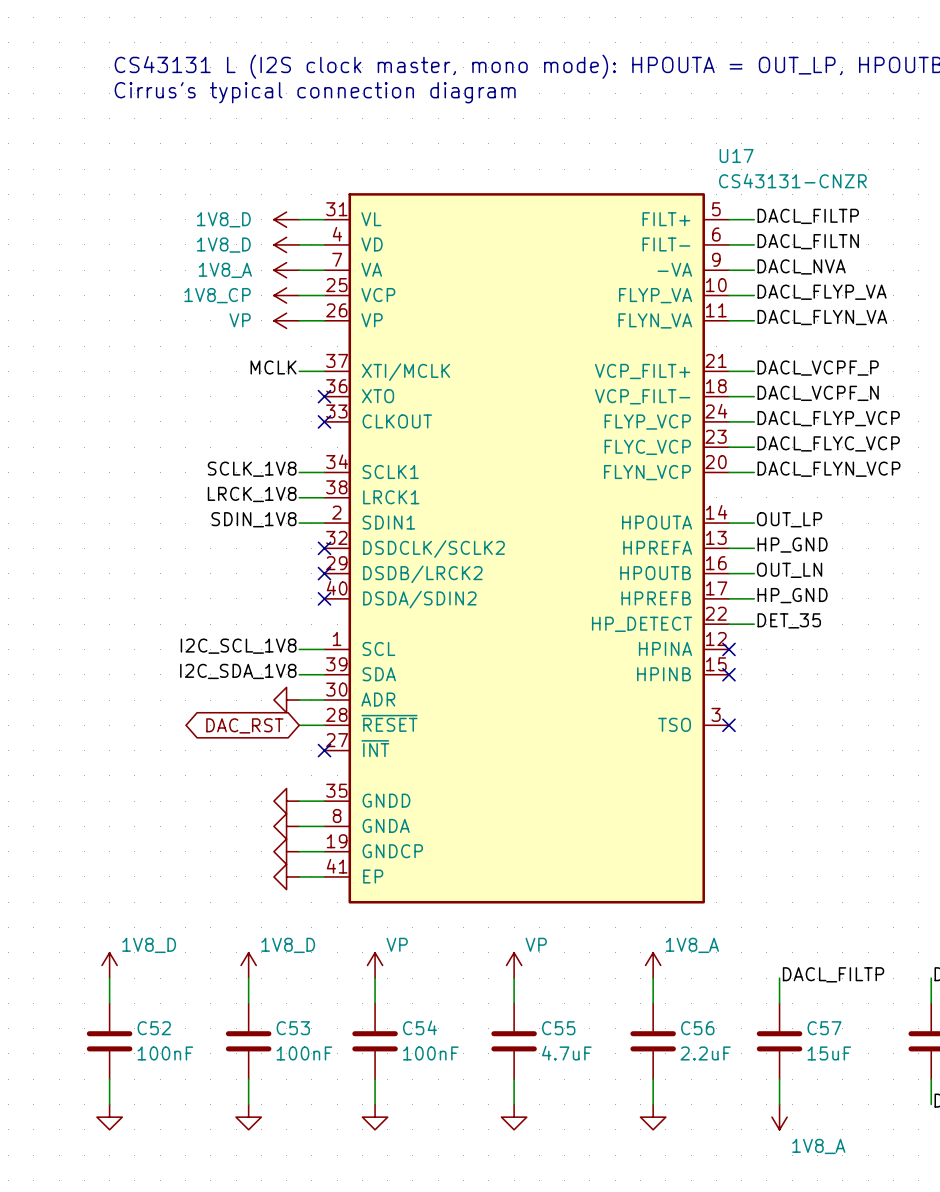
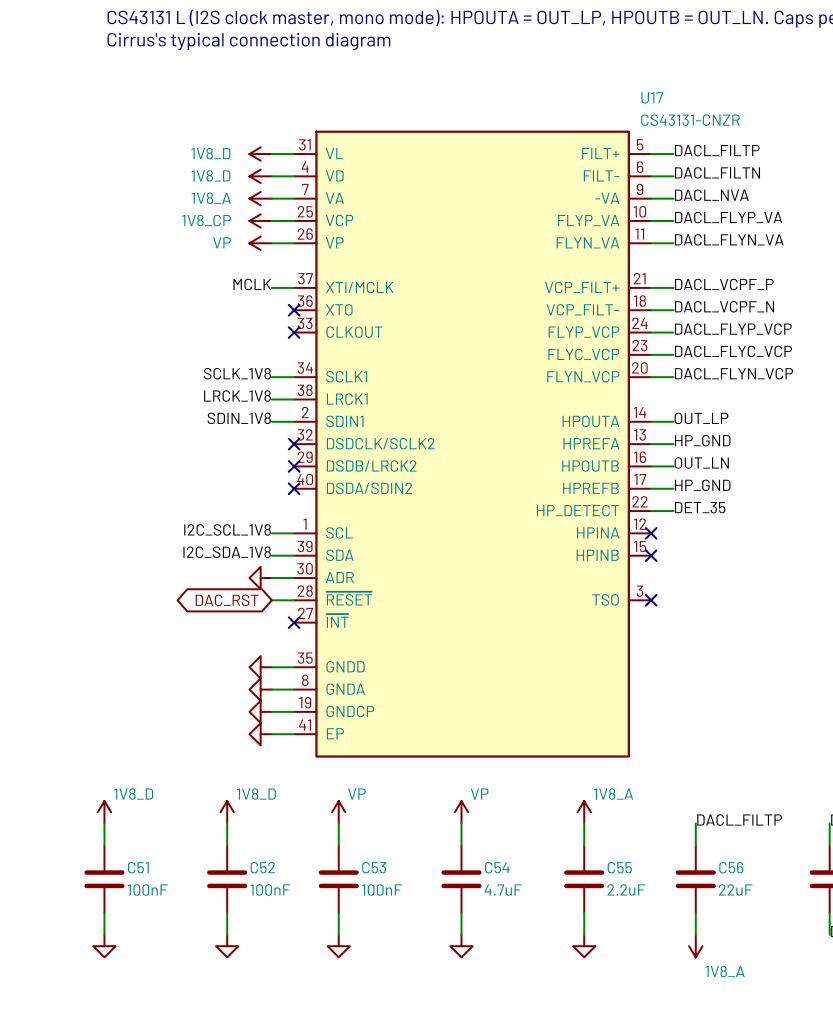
C54 name: C54 (419, 1027) -> C53 (374, 867)
C52 name: C52 (154, 1028) -> C51 (138, 867)
C53 name: C53 (293, 1028) -> C52 (262, 867)
C55 name: C55 (558, 1028) -> C54 (497, 867)
C56 name: C56 (697, 1028) -> C55 (619, 867)
C57 name: C57 (824, 1028) -> C56 (731, 867)
C57 value: 15uF (829, 1053) -> 22uF (735, 889)

